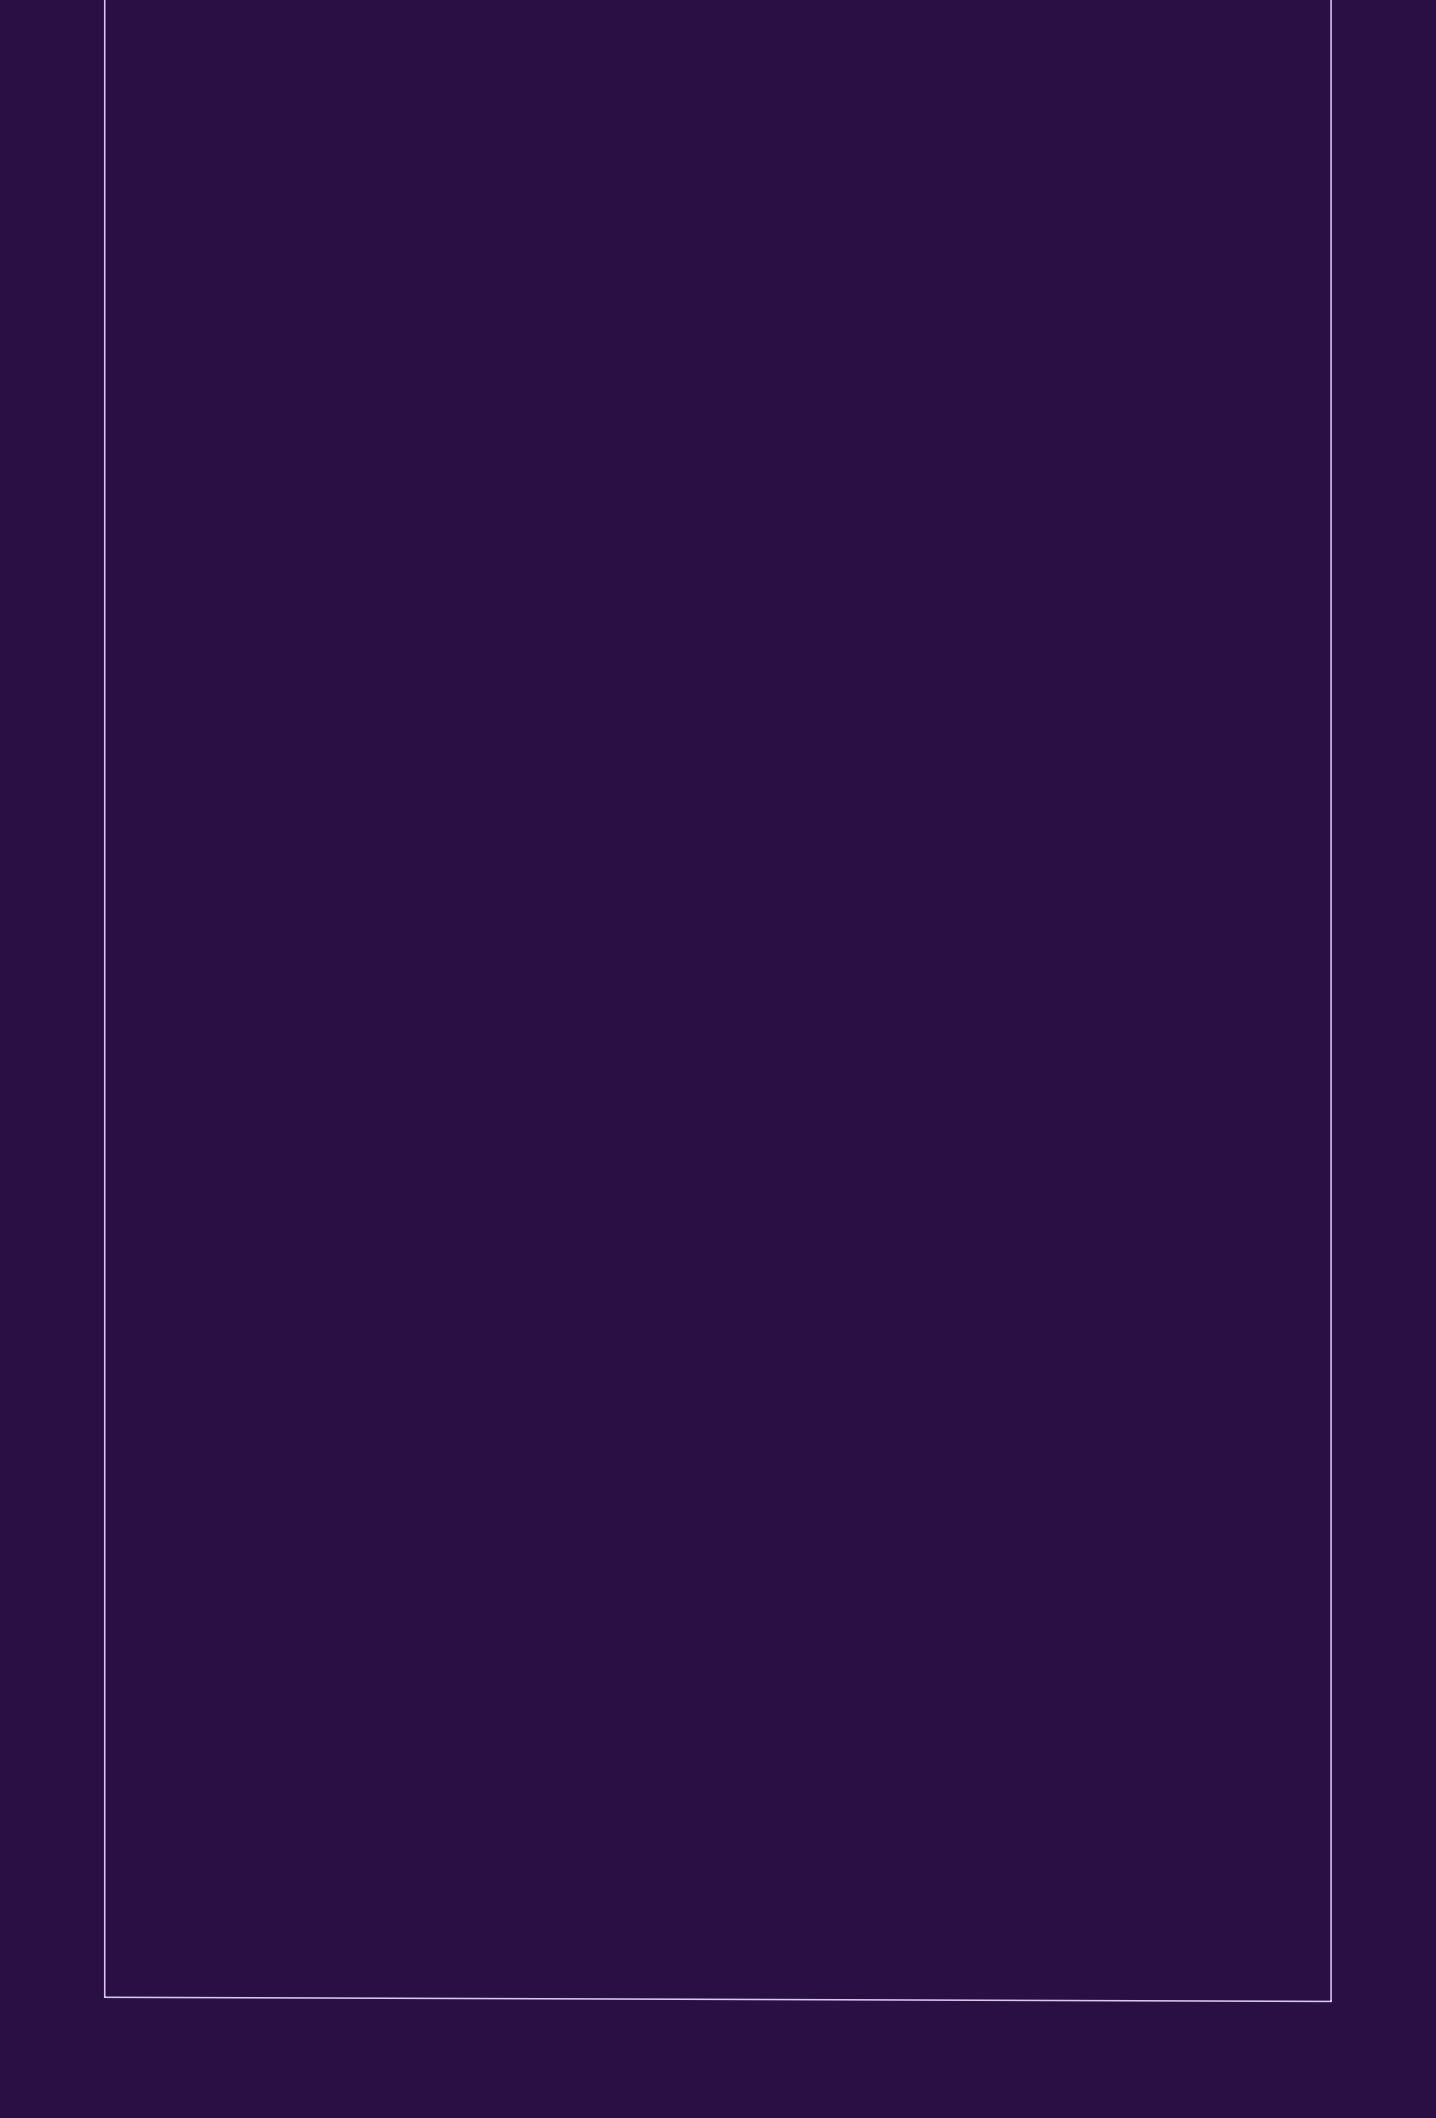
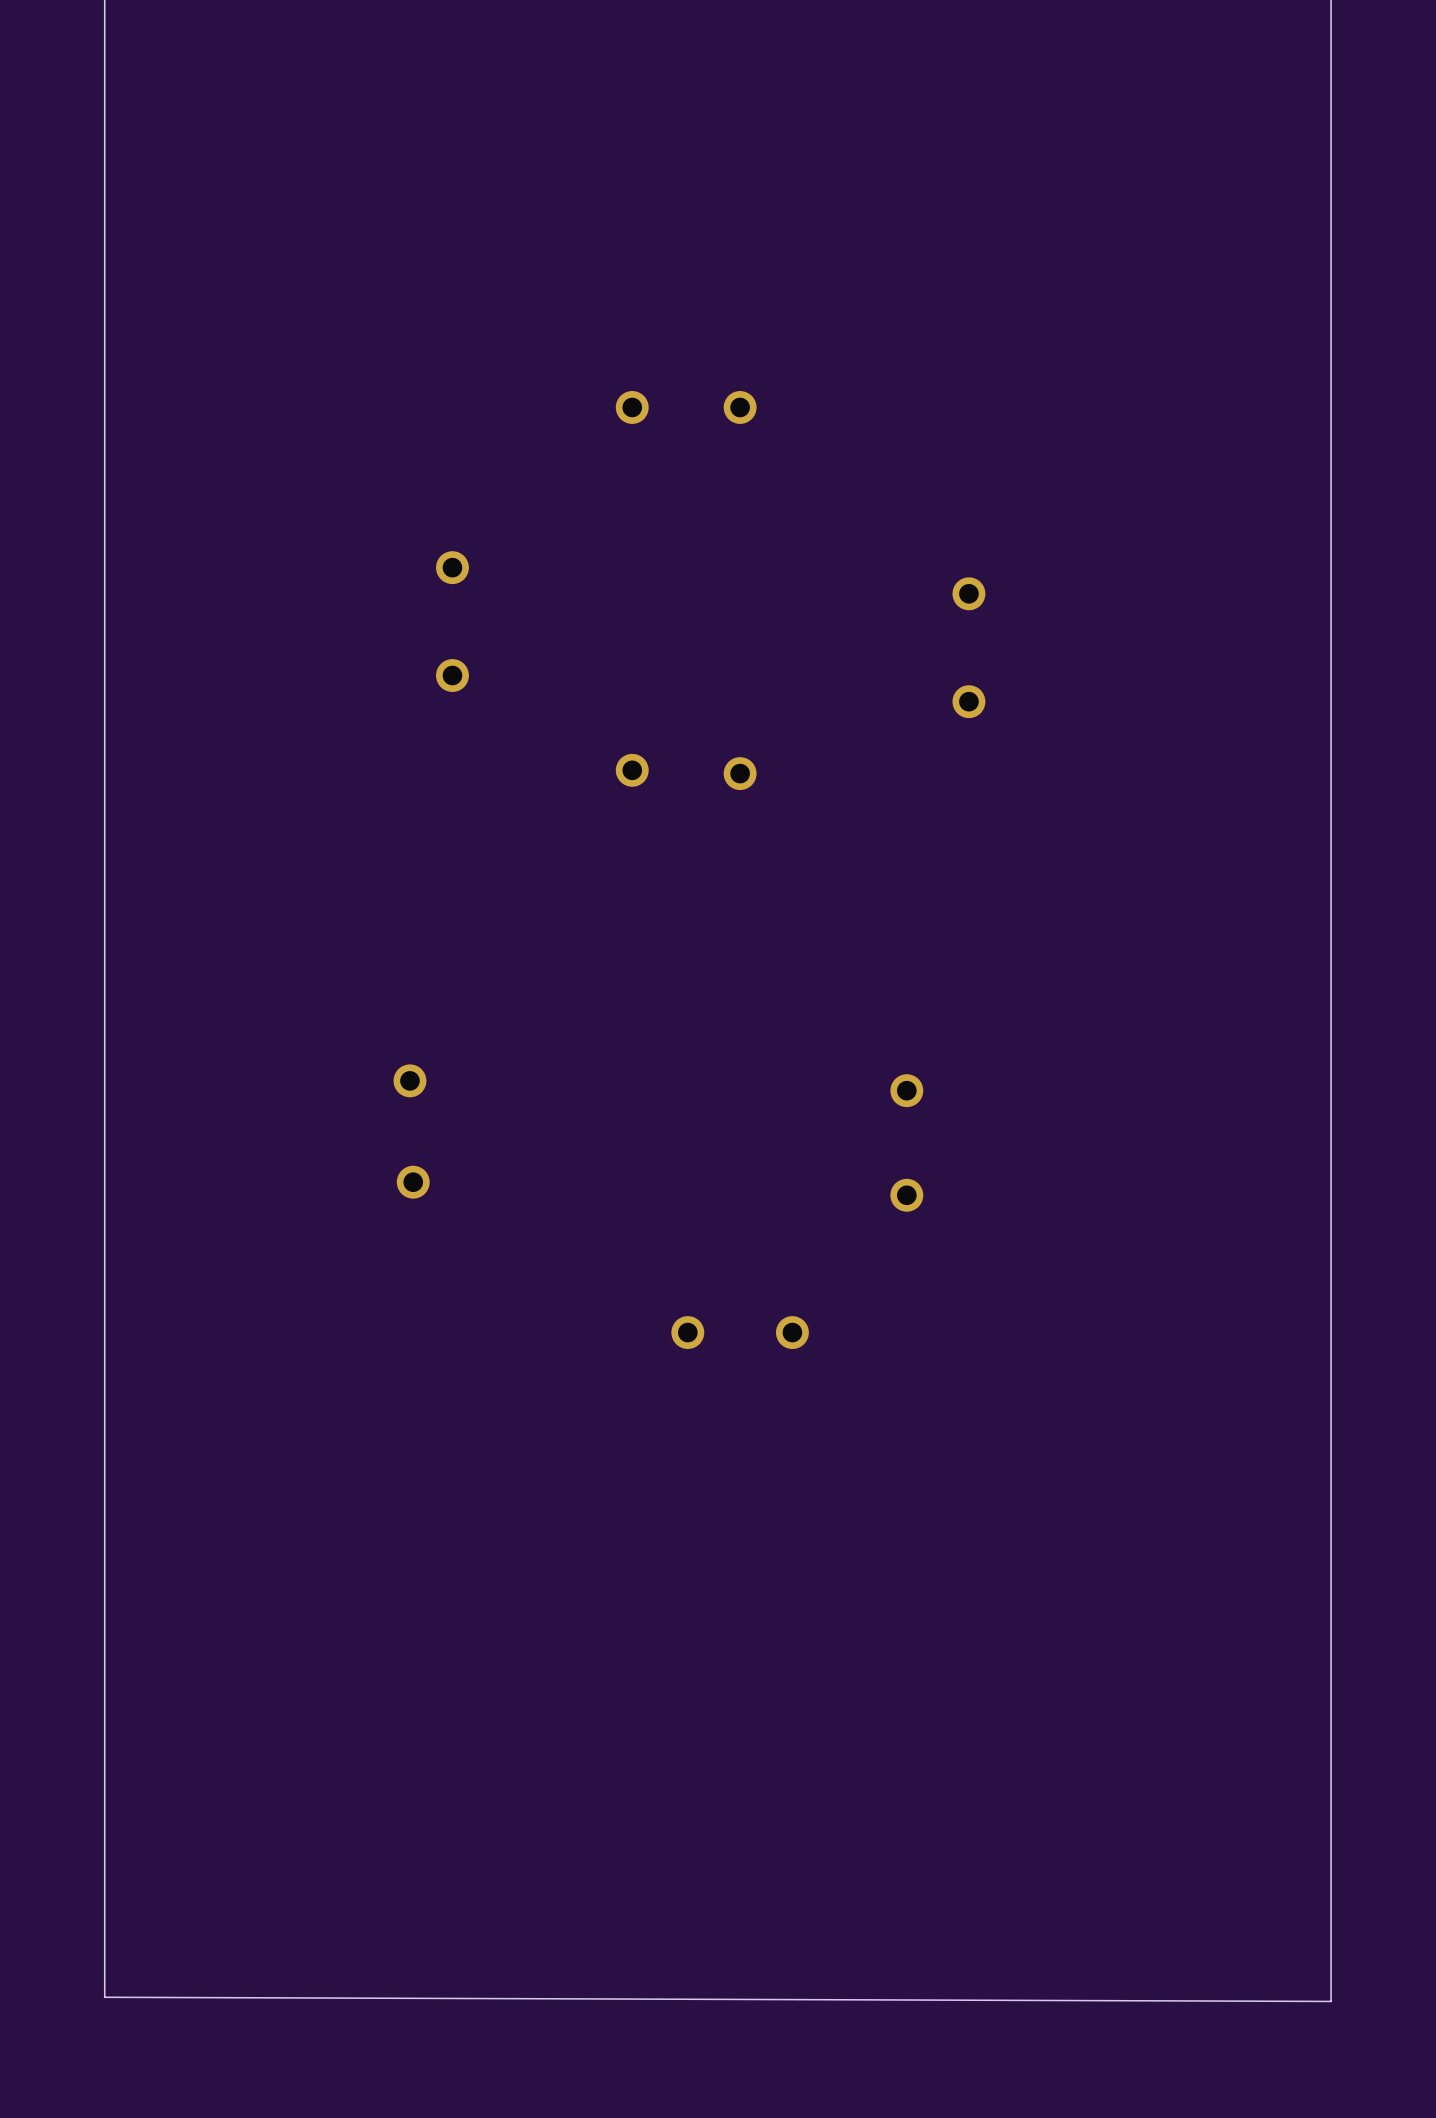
via: none -> (632, 407)
via: none -> (740, 407)
via: none -> (452, 567)
via: none -> (968, 593)
via: none -> (452, 675)
via: none -> (968, 701)
via: none -> (632, 770)
via: none -> (740, 773)
via: none -> (409, 1080)
via: none -> (906, 1090)
via: none -> (413, 1182)
via: none -> (906, 1195)
via: none -> (687, 1332)
via: none -> (792, 1332)

